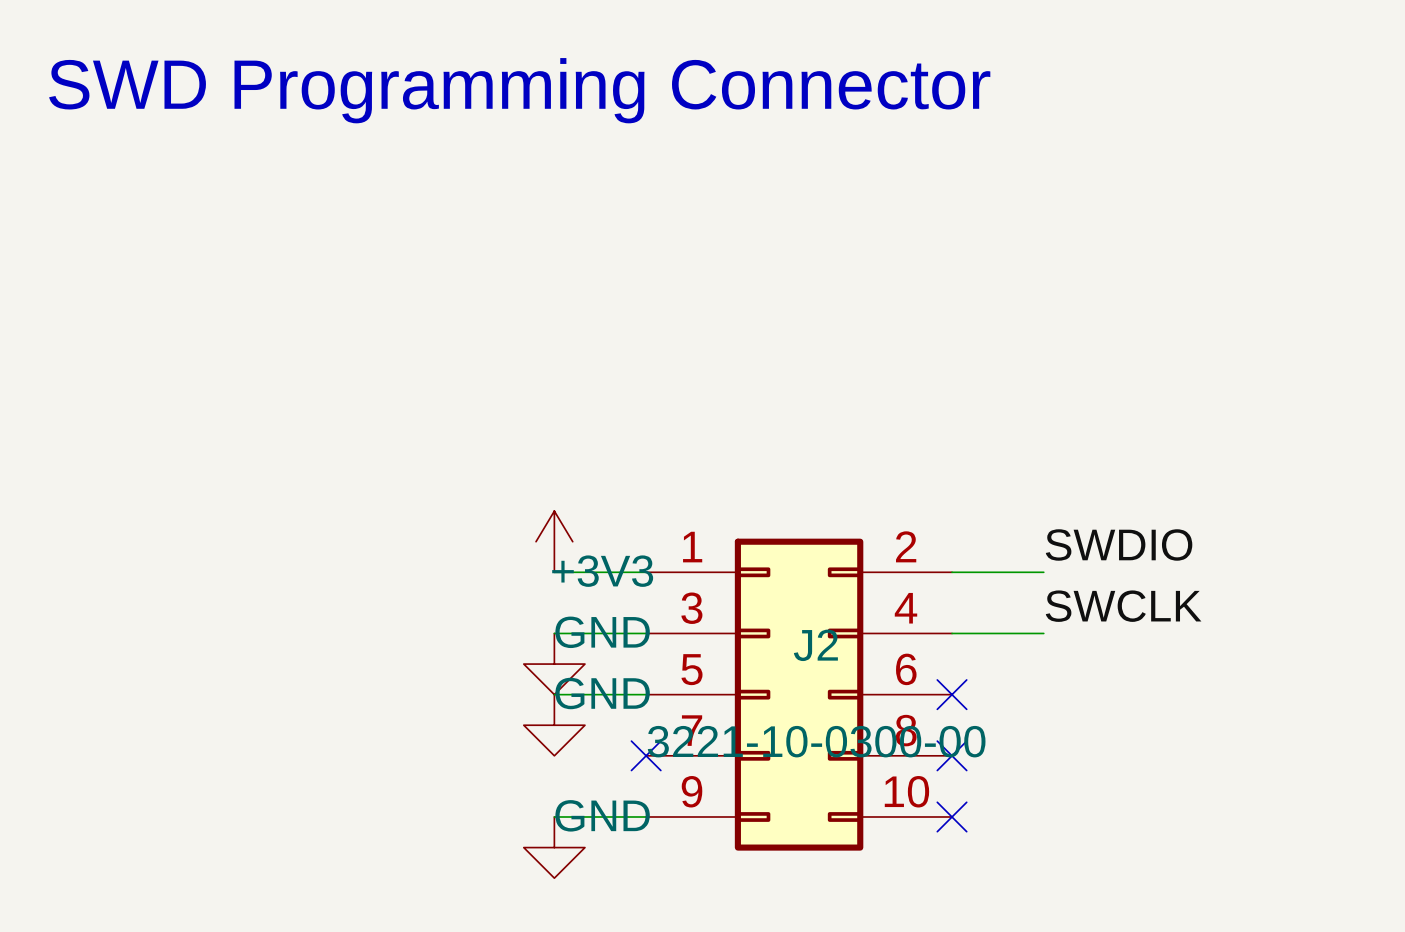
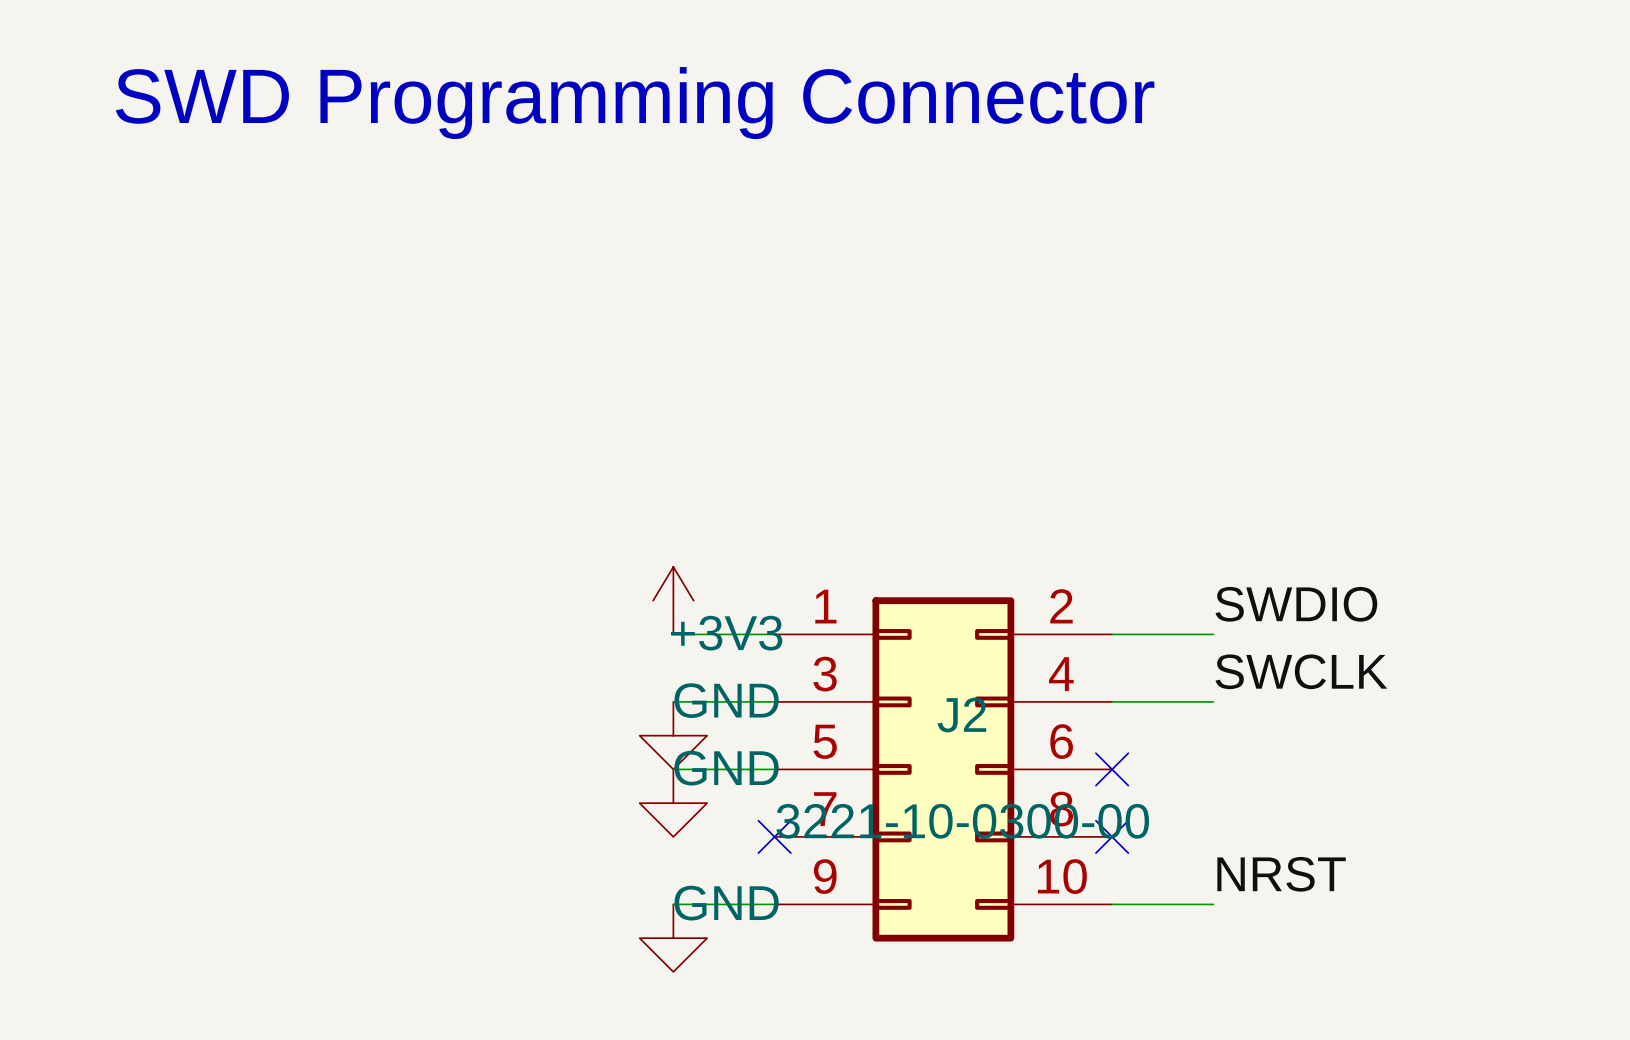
label: none -> NRST (1281, 874)
wire: none -> (1112, 904) (1213, 904)
no-connect mark: (952, 816) -> none

